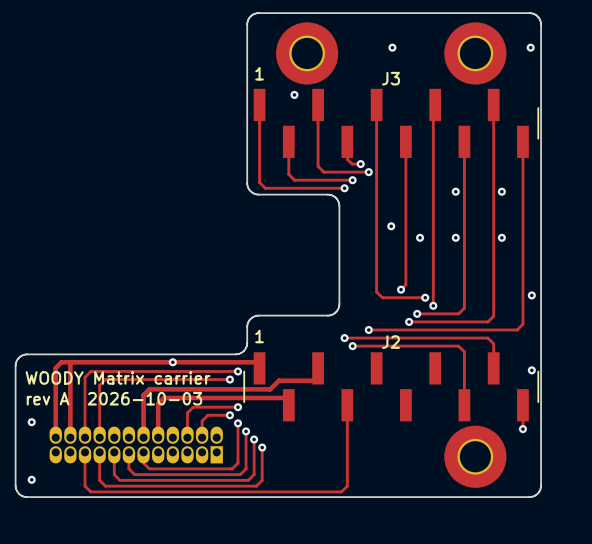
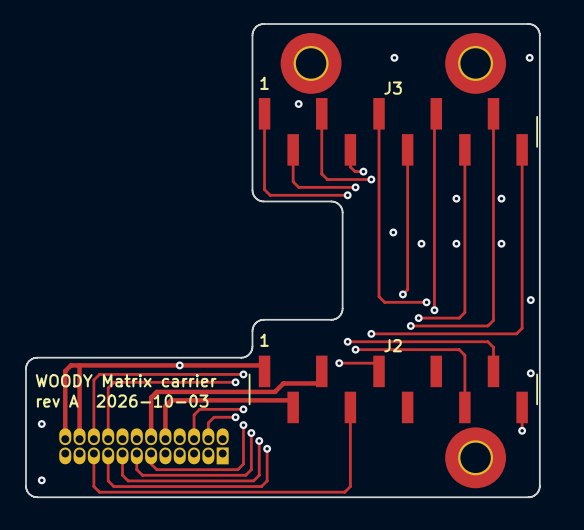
track: none -> (339, 363) (379, 363)
via: none -> (339, 363)

